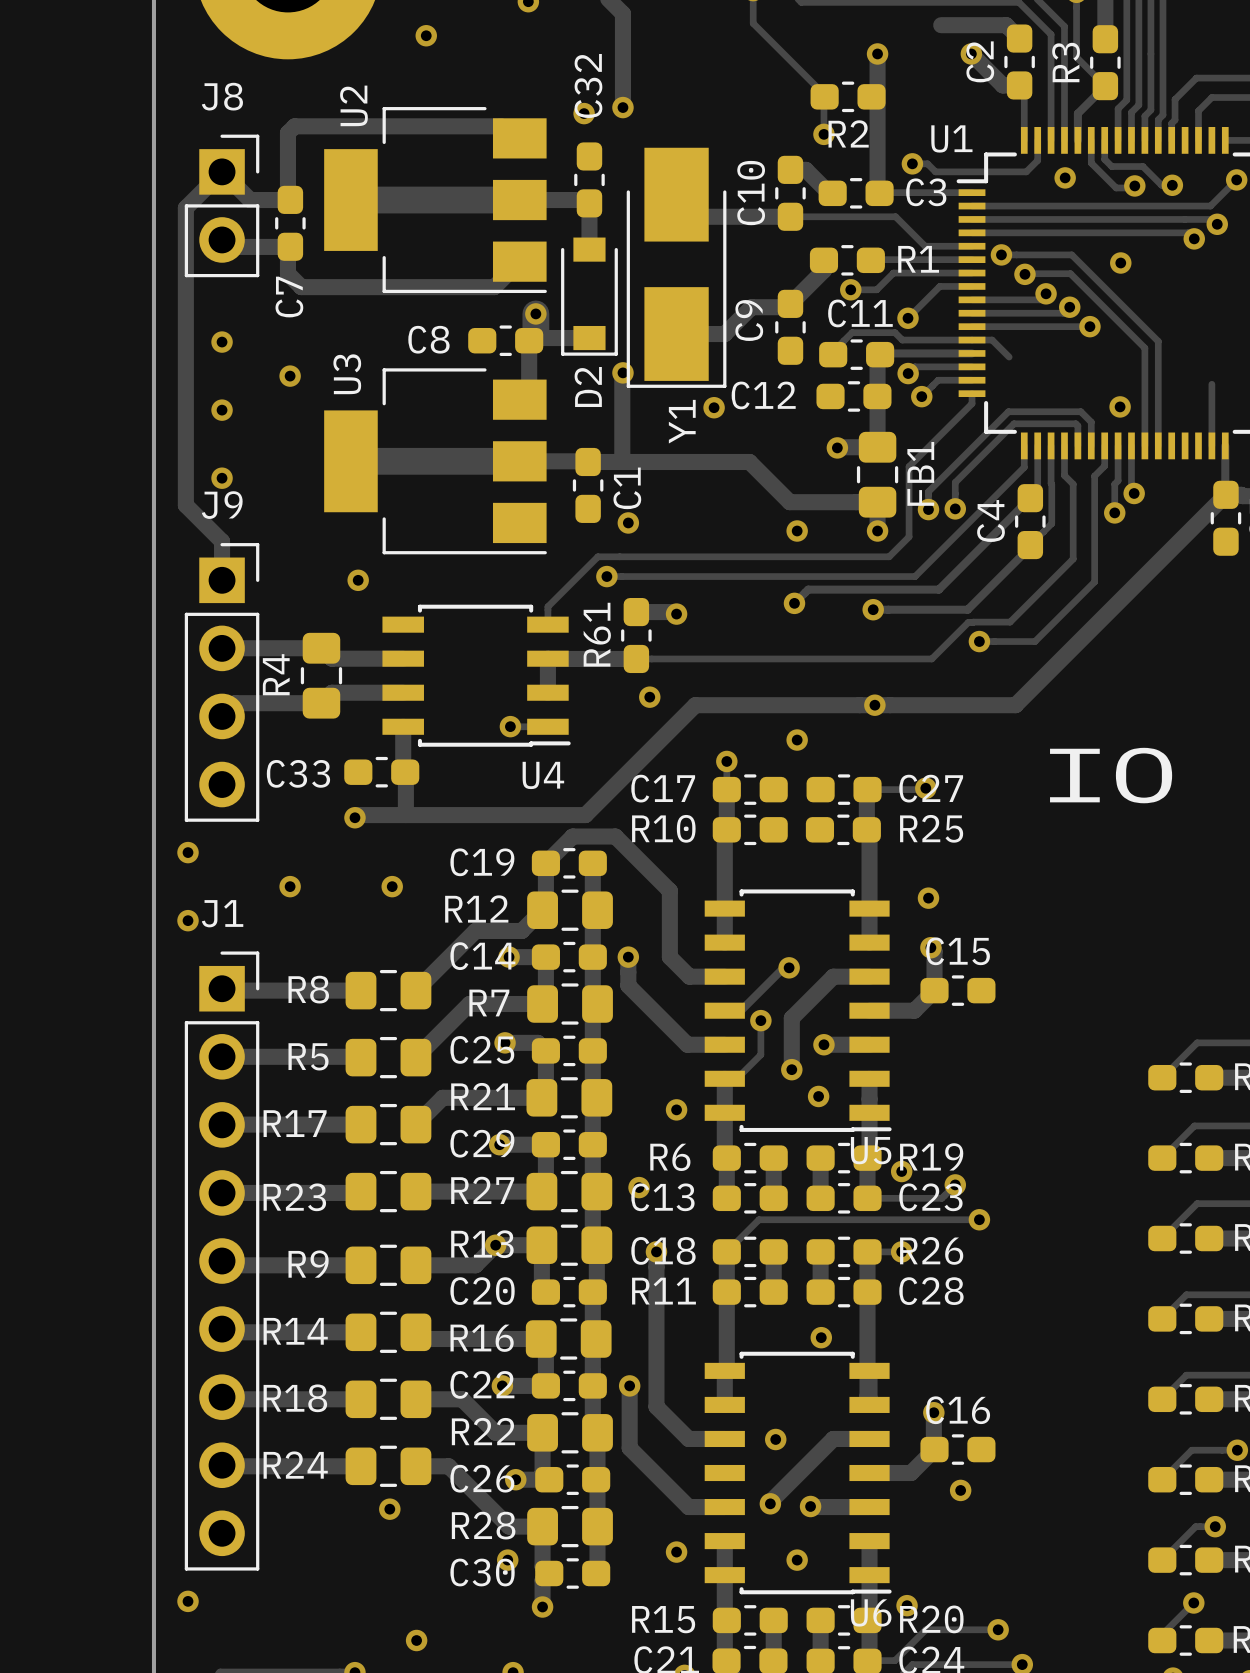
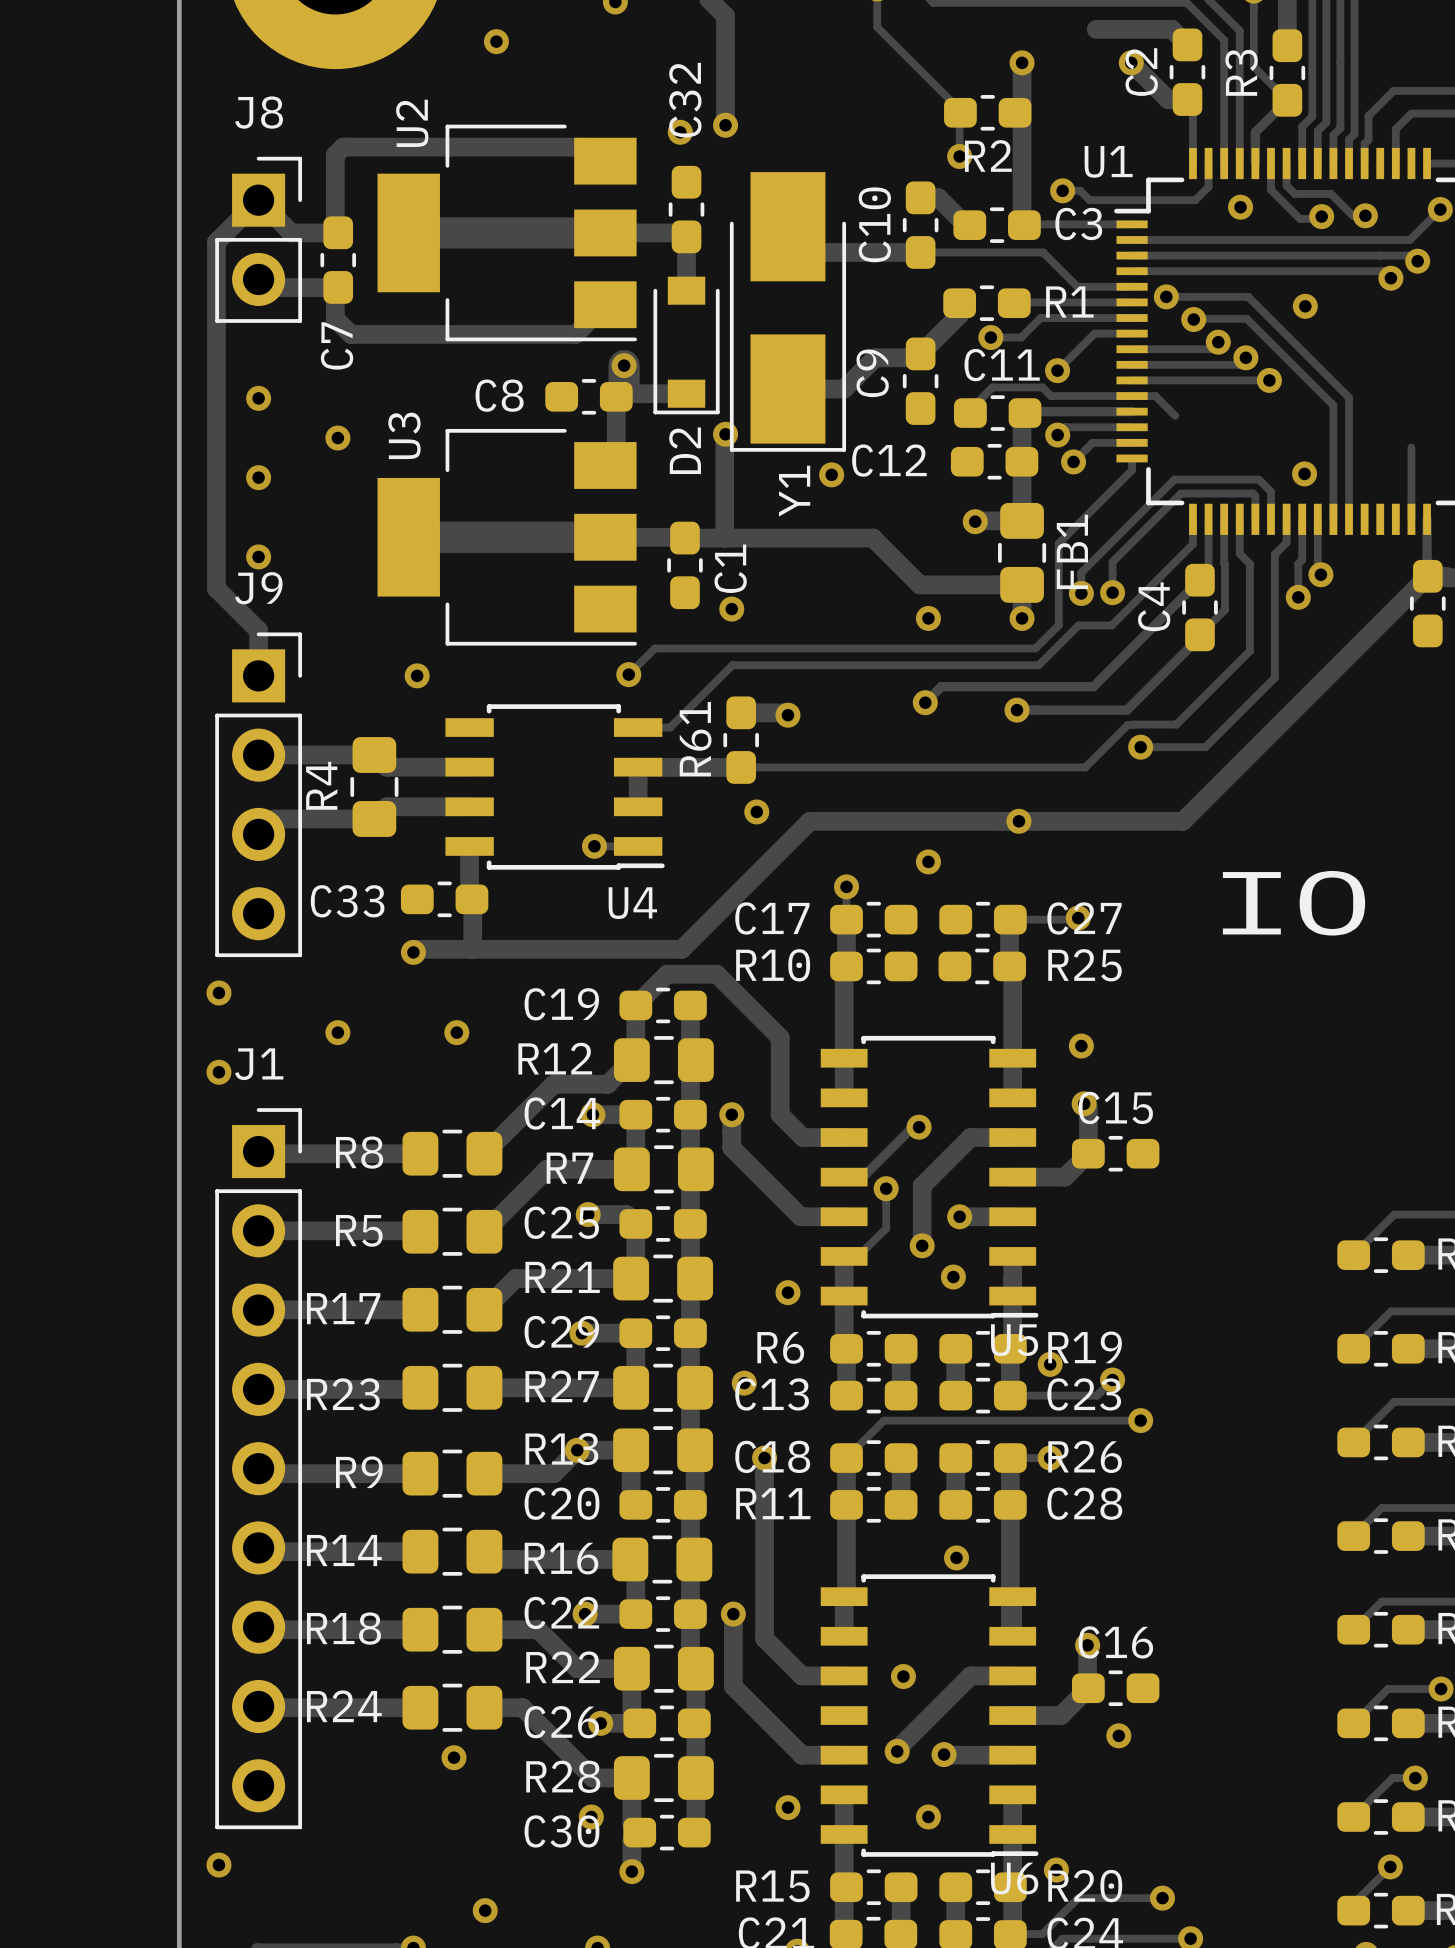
track: (954, 537) (915, 576) (606, 576) -> (1111, 625) (1078, 625) (1038, 665) (732, 665) (670, 727) (638, 727)
track: (597, 556) (547, 606) (547, 624) -> (696, 648) (654, 648) (628, 674)
via position: (606, 576) -> (628, 674)

